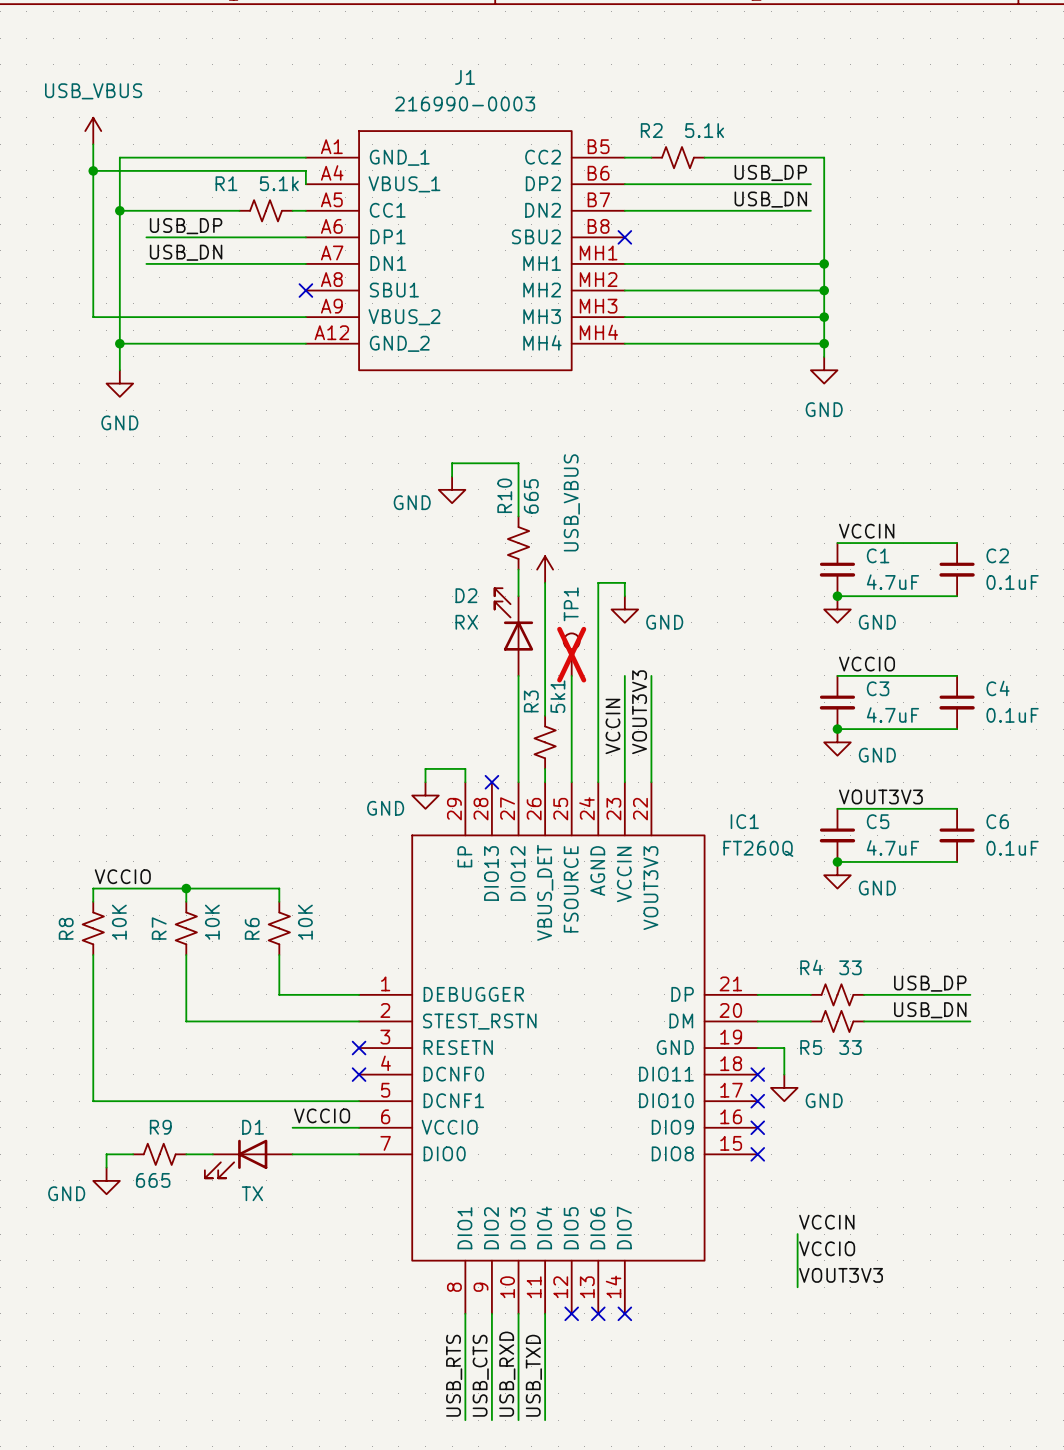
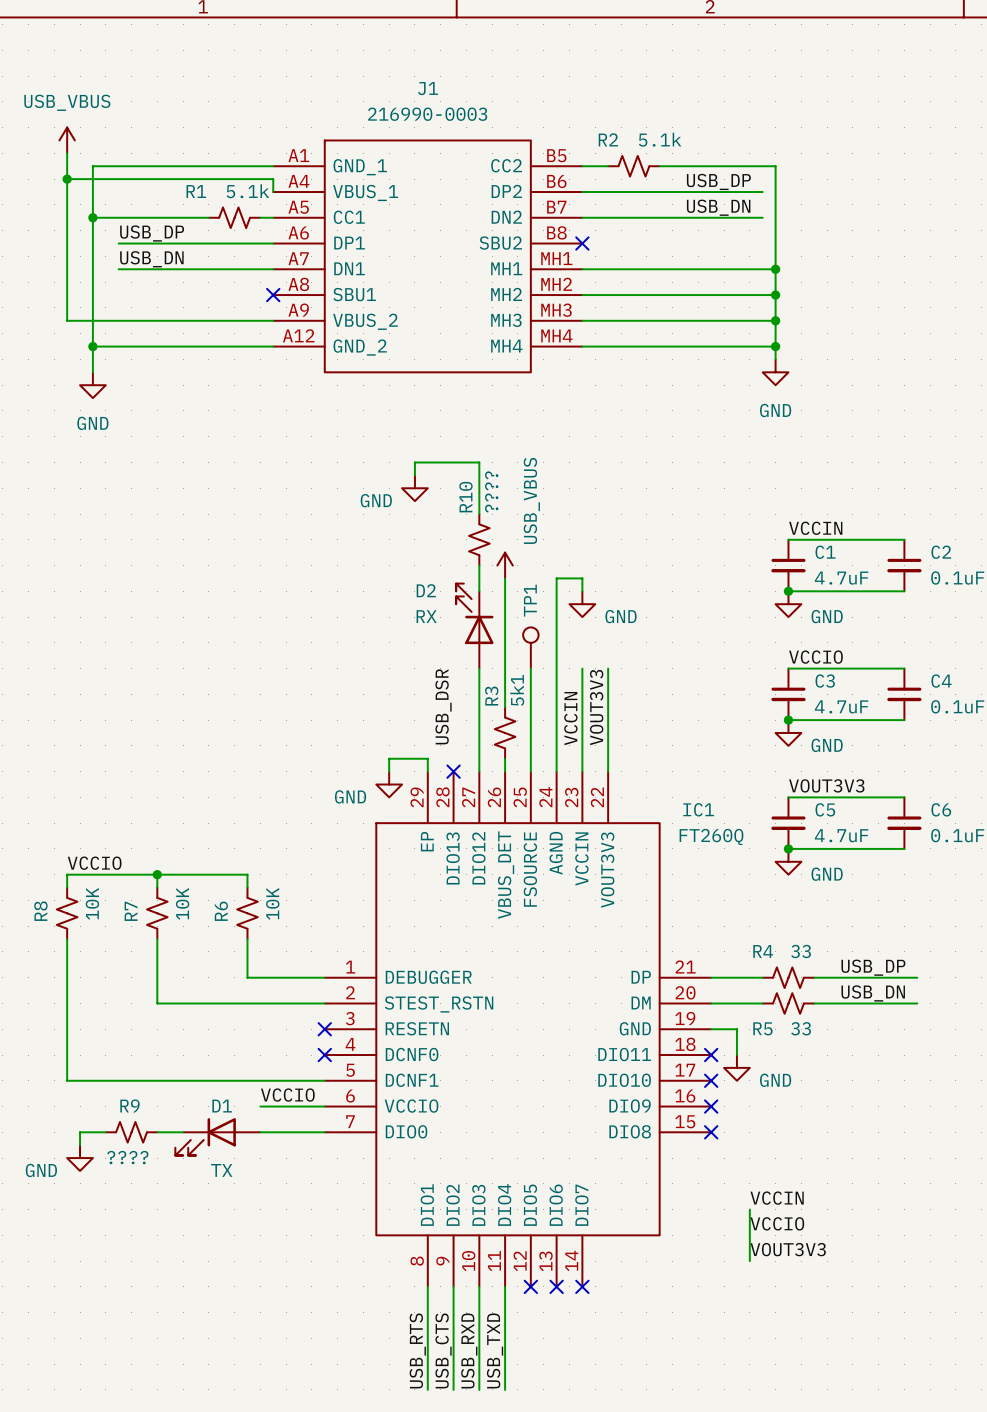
R10 value: 665 (531, 496) -> ???? (491, 491)
TP1 do-not-place cross: (571, 654) -> none
label: none -> USB_DSR (443, 706)
R9 value: 665 (153, 1180) -> ???? (127, 1157)

